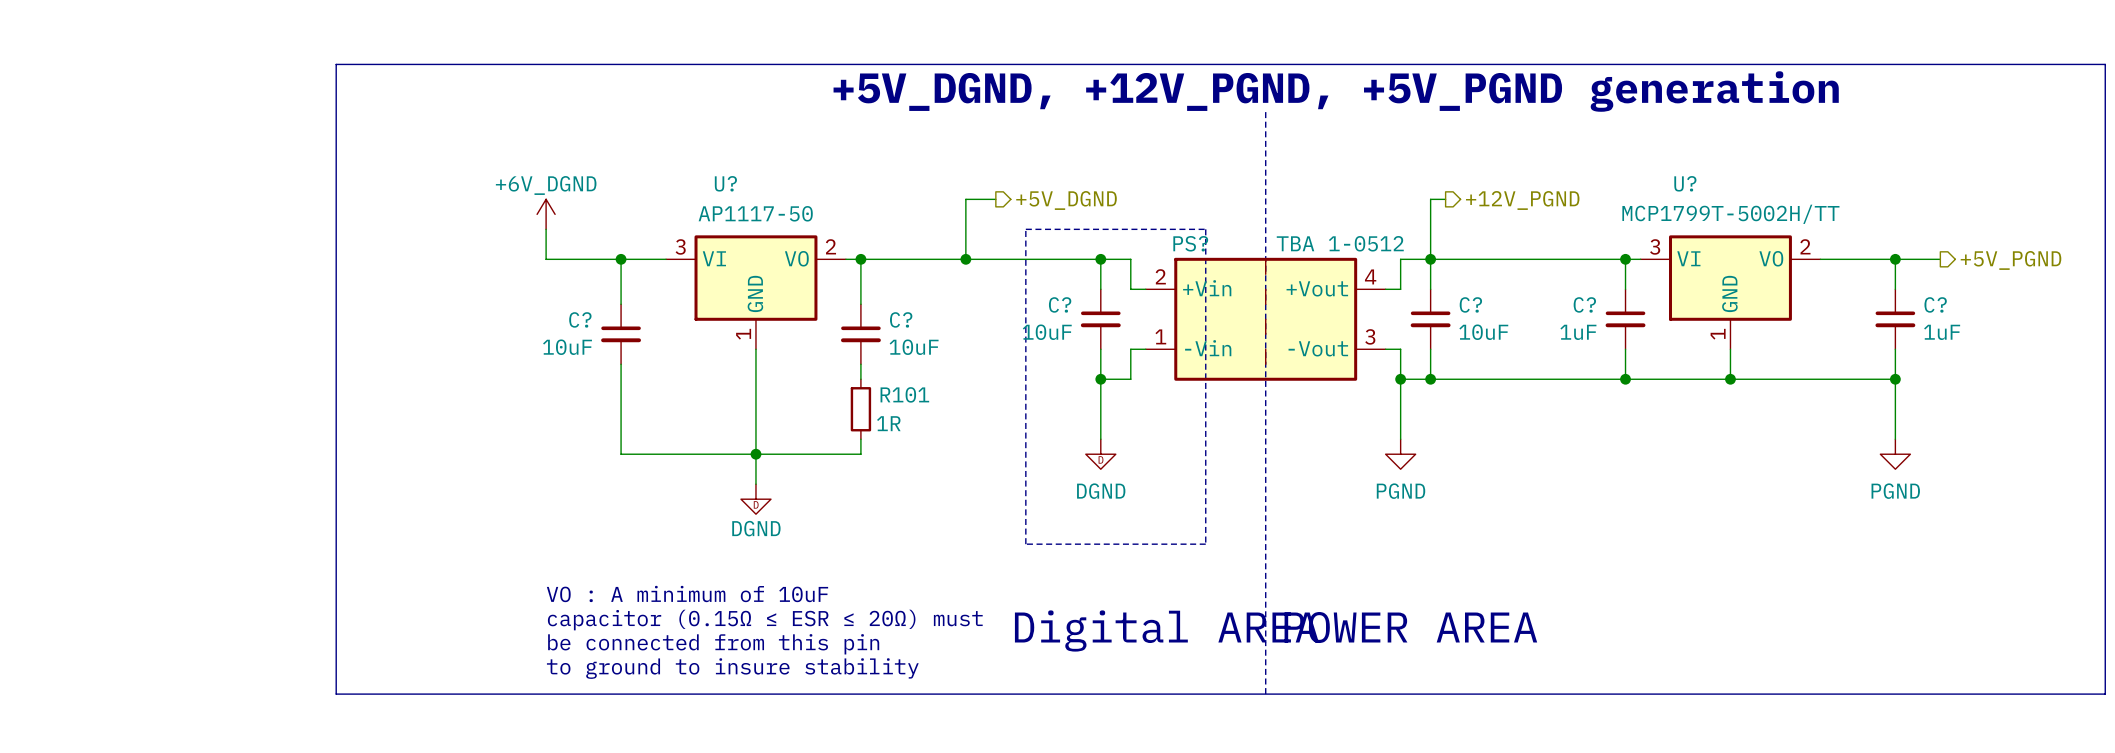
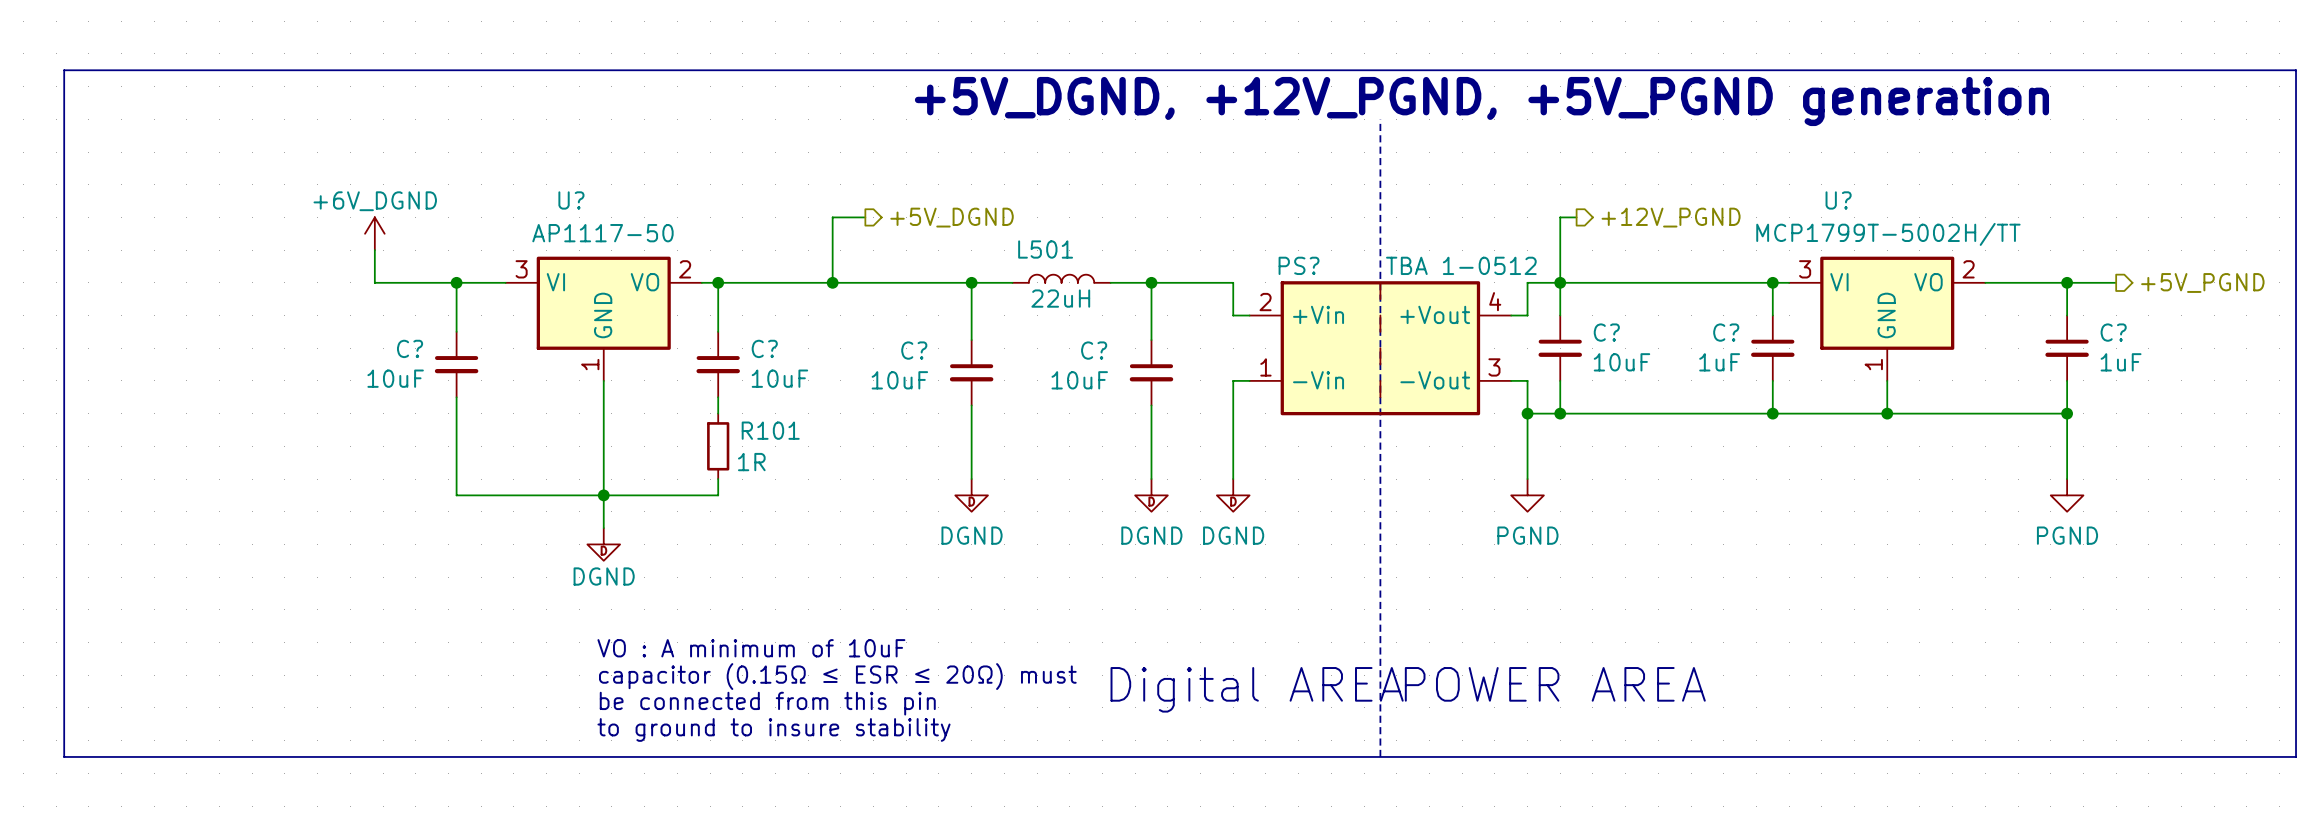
line: (336, 64) (336, 694) -> (366, 70) (64, 70) (64, 756) (366, 756)
wire: (995, 199) (965, 199) (965, 259) -> (865, 217) (832, 217) (832, 282)
hierarchical label position: +5V_DGND (1066, 200) -> +5V_DGND (952, 217)
power symbol position: +6V_DGND (546, 214) -> +6V_DGND (374, 233)
wire: none -> (374, 250) (374, 282) (505, 282)
line: (1025, 229) (1205, 229) (1205, 544) (1025, 544) (1025, 229) -> none
L501: none -> 22uH (1061, 278)
junction: none -> (456, 282)
wire: (621, 259) (621, 304) -> (456, 282) (456, 331)
junction position: (621, 259) -> (718, 282)
junction: none -> (832, 282)
wire: (860, 259) (860, 304) -> (718, 282) (718, 331)
junction position: (860, 259) -> (971, 282)
wire: none -> (971, 282) (971, 340)
wire: (928, 259) (1018, 259) -> none
junction: (965, 259) -> none
wire: none -> (1151, 282) (1151, 340)
junction: none -> (1151, 282)
wire: (1100, 259) (1100, 289) -> none
junction: (1100, 259) -> none
U? position: (755, 292) -> (603, 318)
C? name position: C? (1060, 304) -> C? (1094, 350)
C? name position: C? (580, 319) -> C? (764, 348)
C? name position: C? (901, 319) -> C? (914, 350)
C? position: (1100, 319) -> (1151, 372)
C? value position: 10uF (1047, 332) -> 10uF (1079, 380)
C?: none -> 10uF (456, 364)
C? position: (621, 334) -> (718, 364)
C? position: (860, 334) -> (971, 372)
C? value position: 10uF (567, 347) -> 10uF (779, 378)
C? value position: 10uF (914, 347) -> 10uF (899, 380)
wire: (755, 349) (755, 484) -> (603, 380) (603, 528)
wire: (1100, 349) (1100, 439) -> none
wire: (621, 364) (621, 454) -> (456, 397) (456, 495) (677, 495)
wire: (860, 364) (860, 379) -> (718, 397) (718, 413)
wire: none -> (971, 405) (971, 479)
wire: none -> (1151, 405) (1151, 479)
wire: (1100, 379) (1130, 379) -> (1233, 479) (1233, 413)
junction: (1100, 379) -> none
R101 position: (860, 409) -> (718, 446)
wire: (860, 439) (860, 454) (658, 454) -> (718, 479) (718, 495)
junction: none -> (603, 495)
junction: (755, 454) -> none
power symbol: none -> DGND (971, 495)
power symbol: none -> DGND (1151, 495)
power symbol: DGND (1100, 454) -> none
power symbol: none -> DGND (1233, 495)
power symbol: none -> DGND (603, 544)
power symbol: DGND (755, 499) -> none

